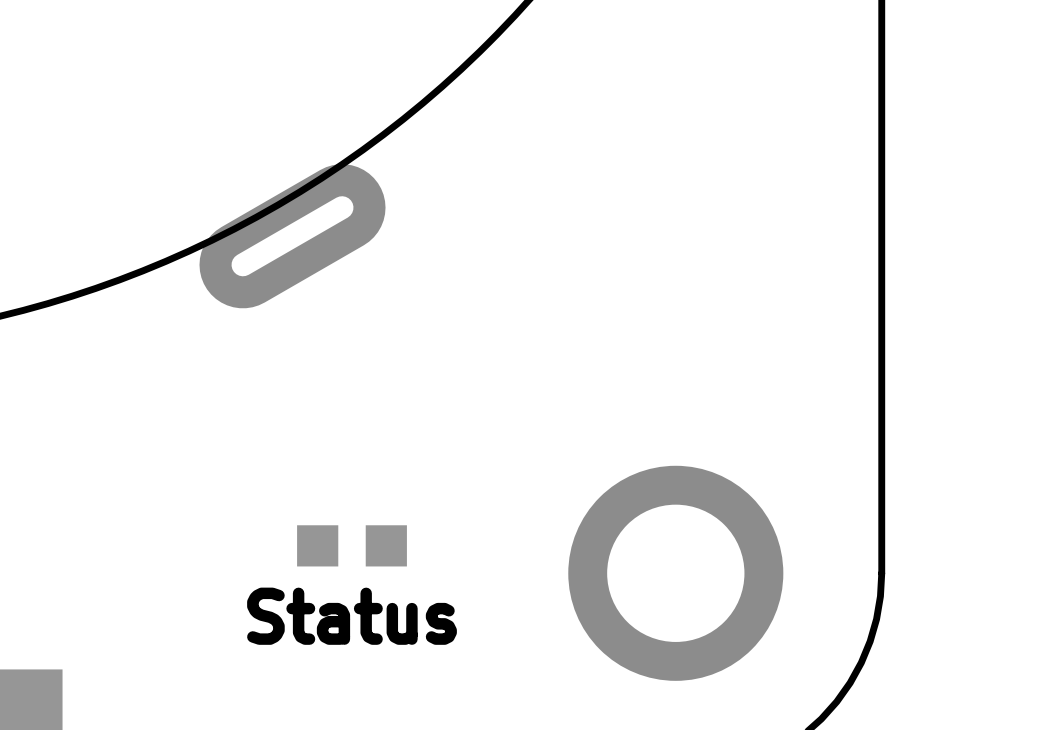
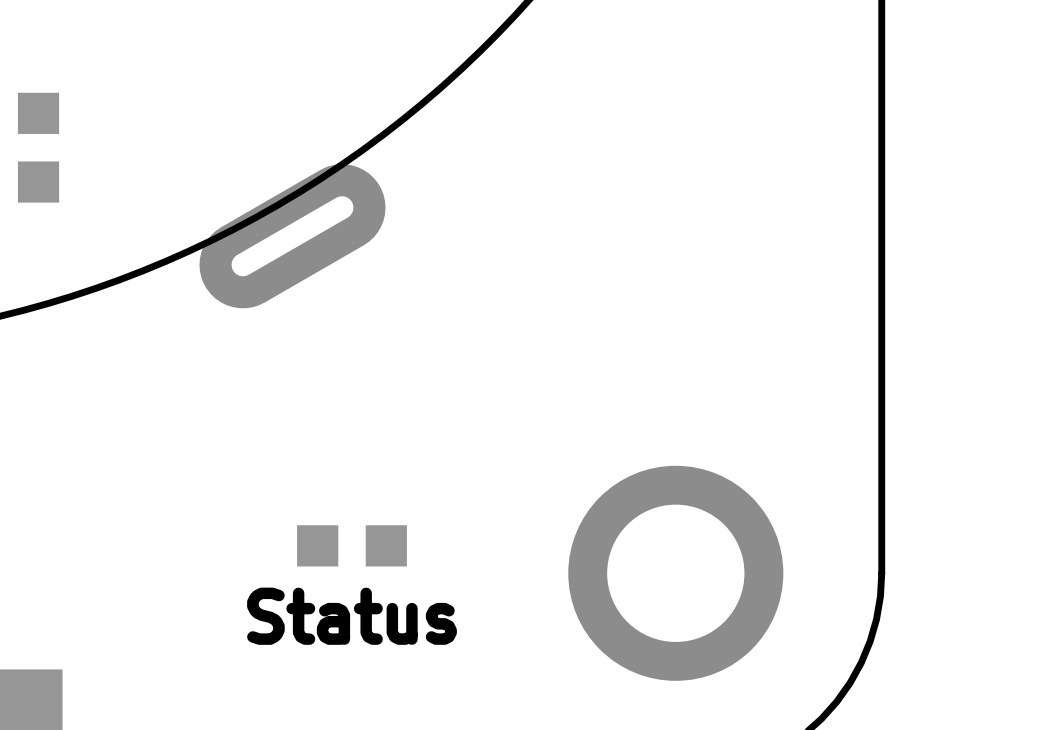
part: none -> (38, 147)

